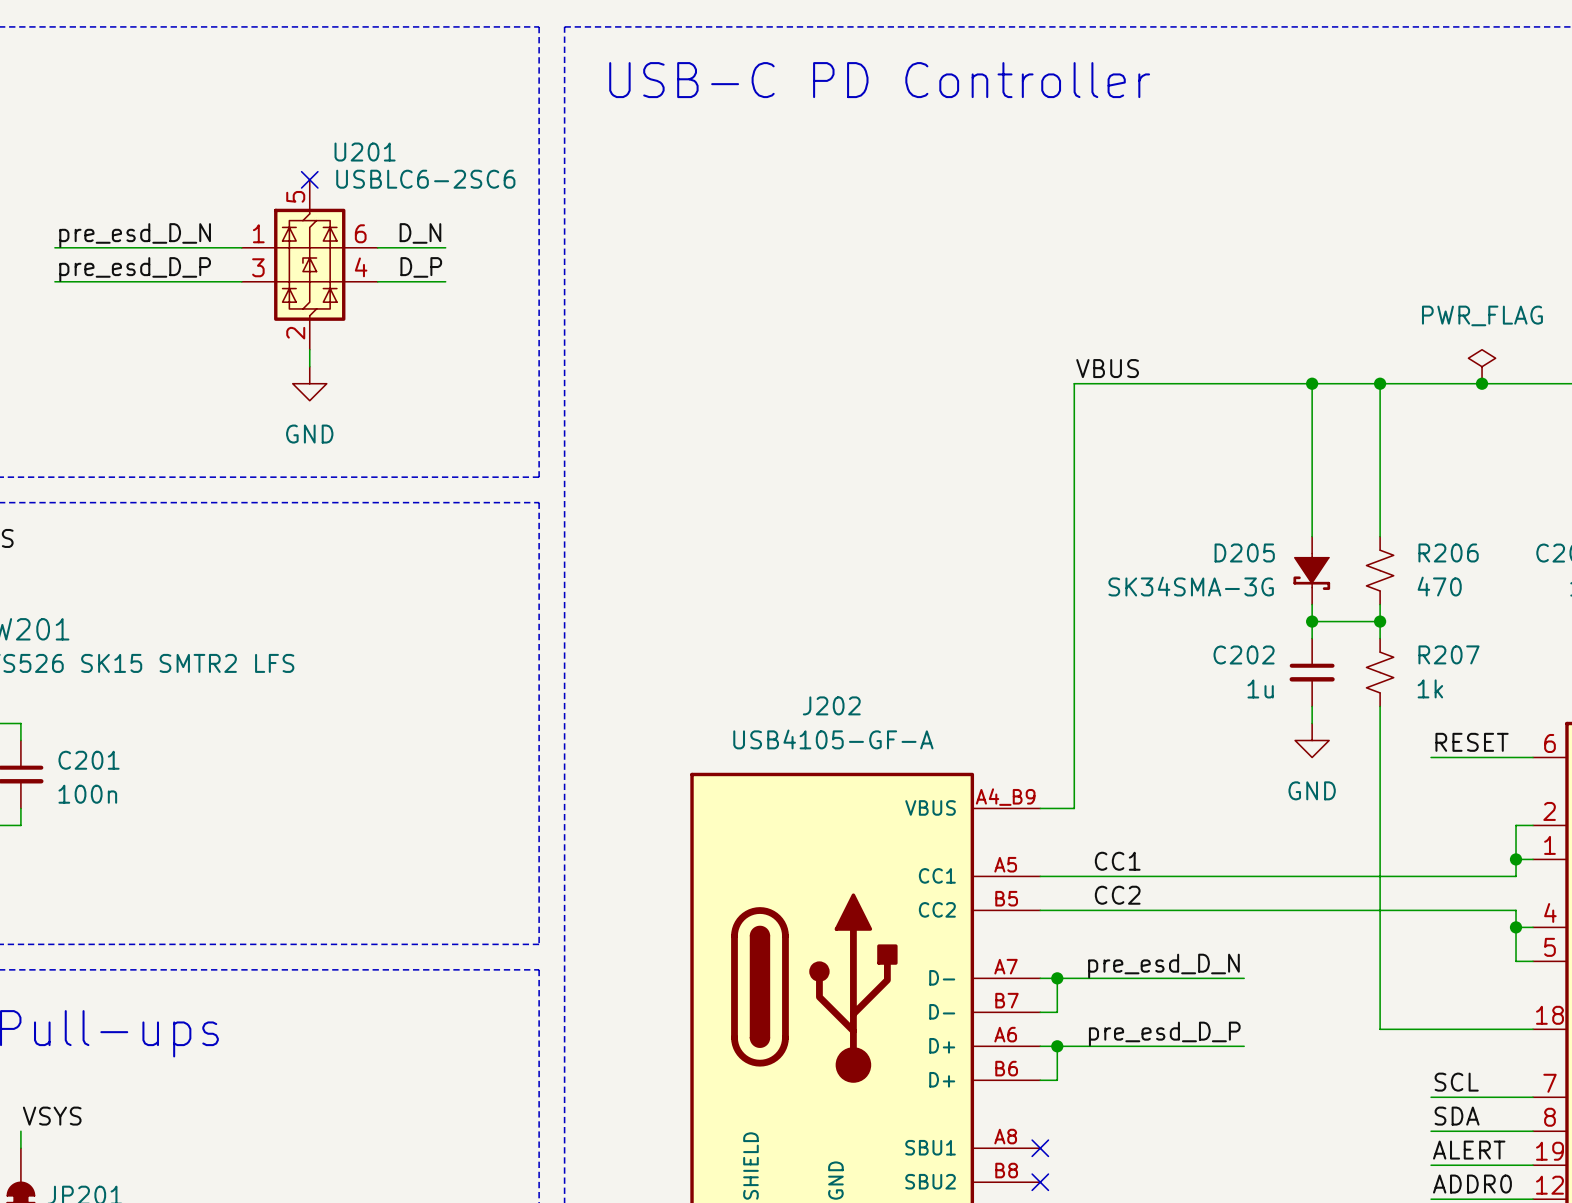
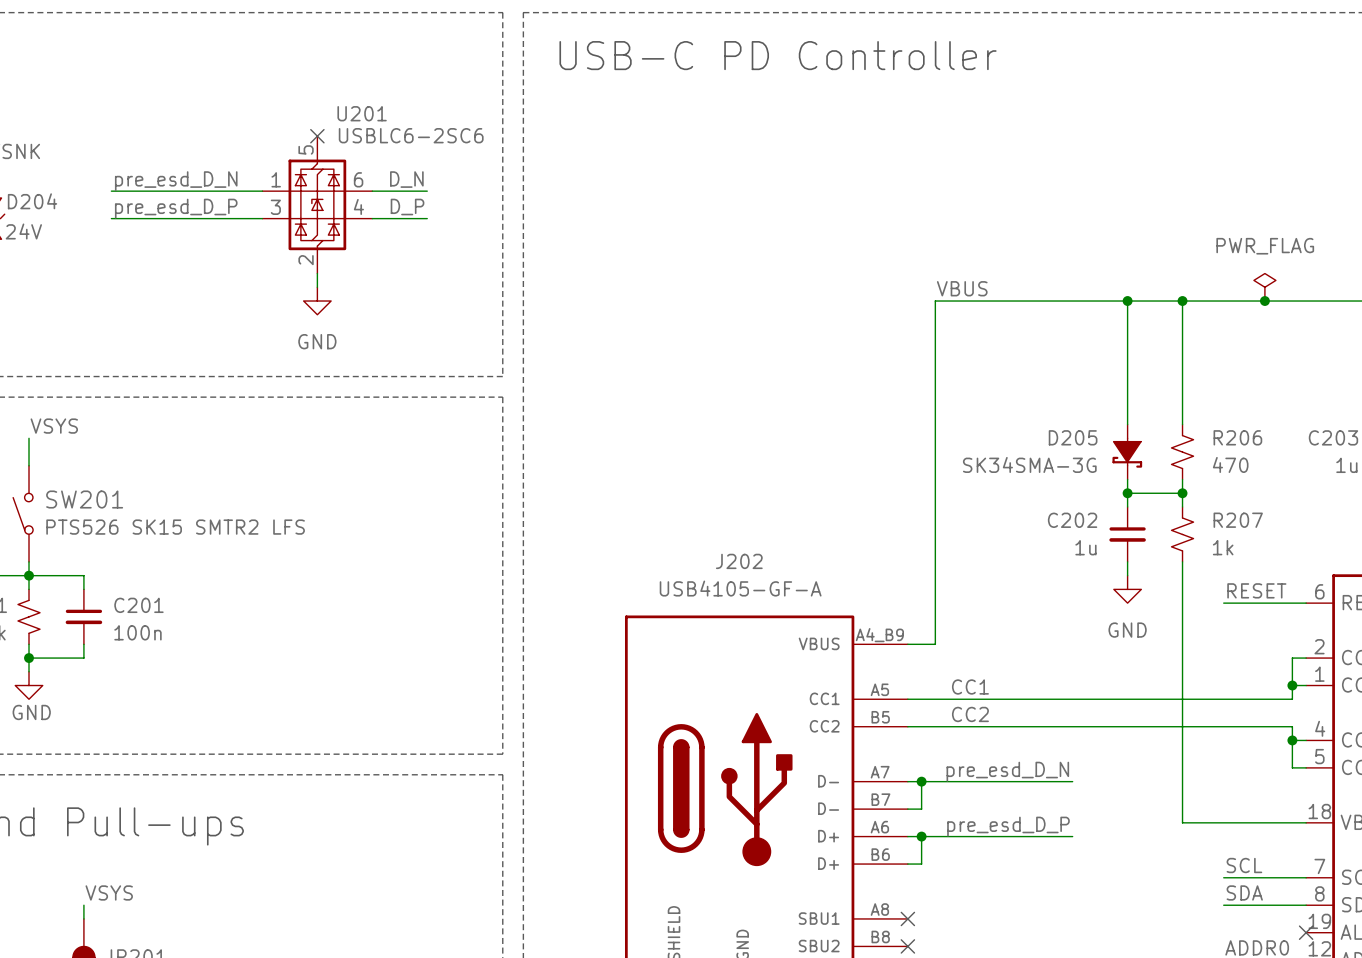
label: ALERT (1469, 1150) -> none
wire: (1431, 1165) (1533, 1165) -> none
no-connect mark: none -> (1306, 932)

